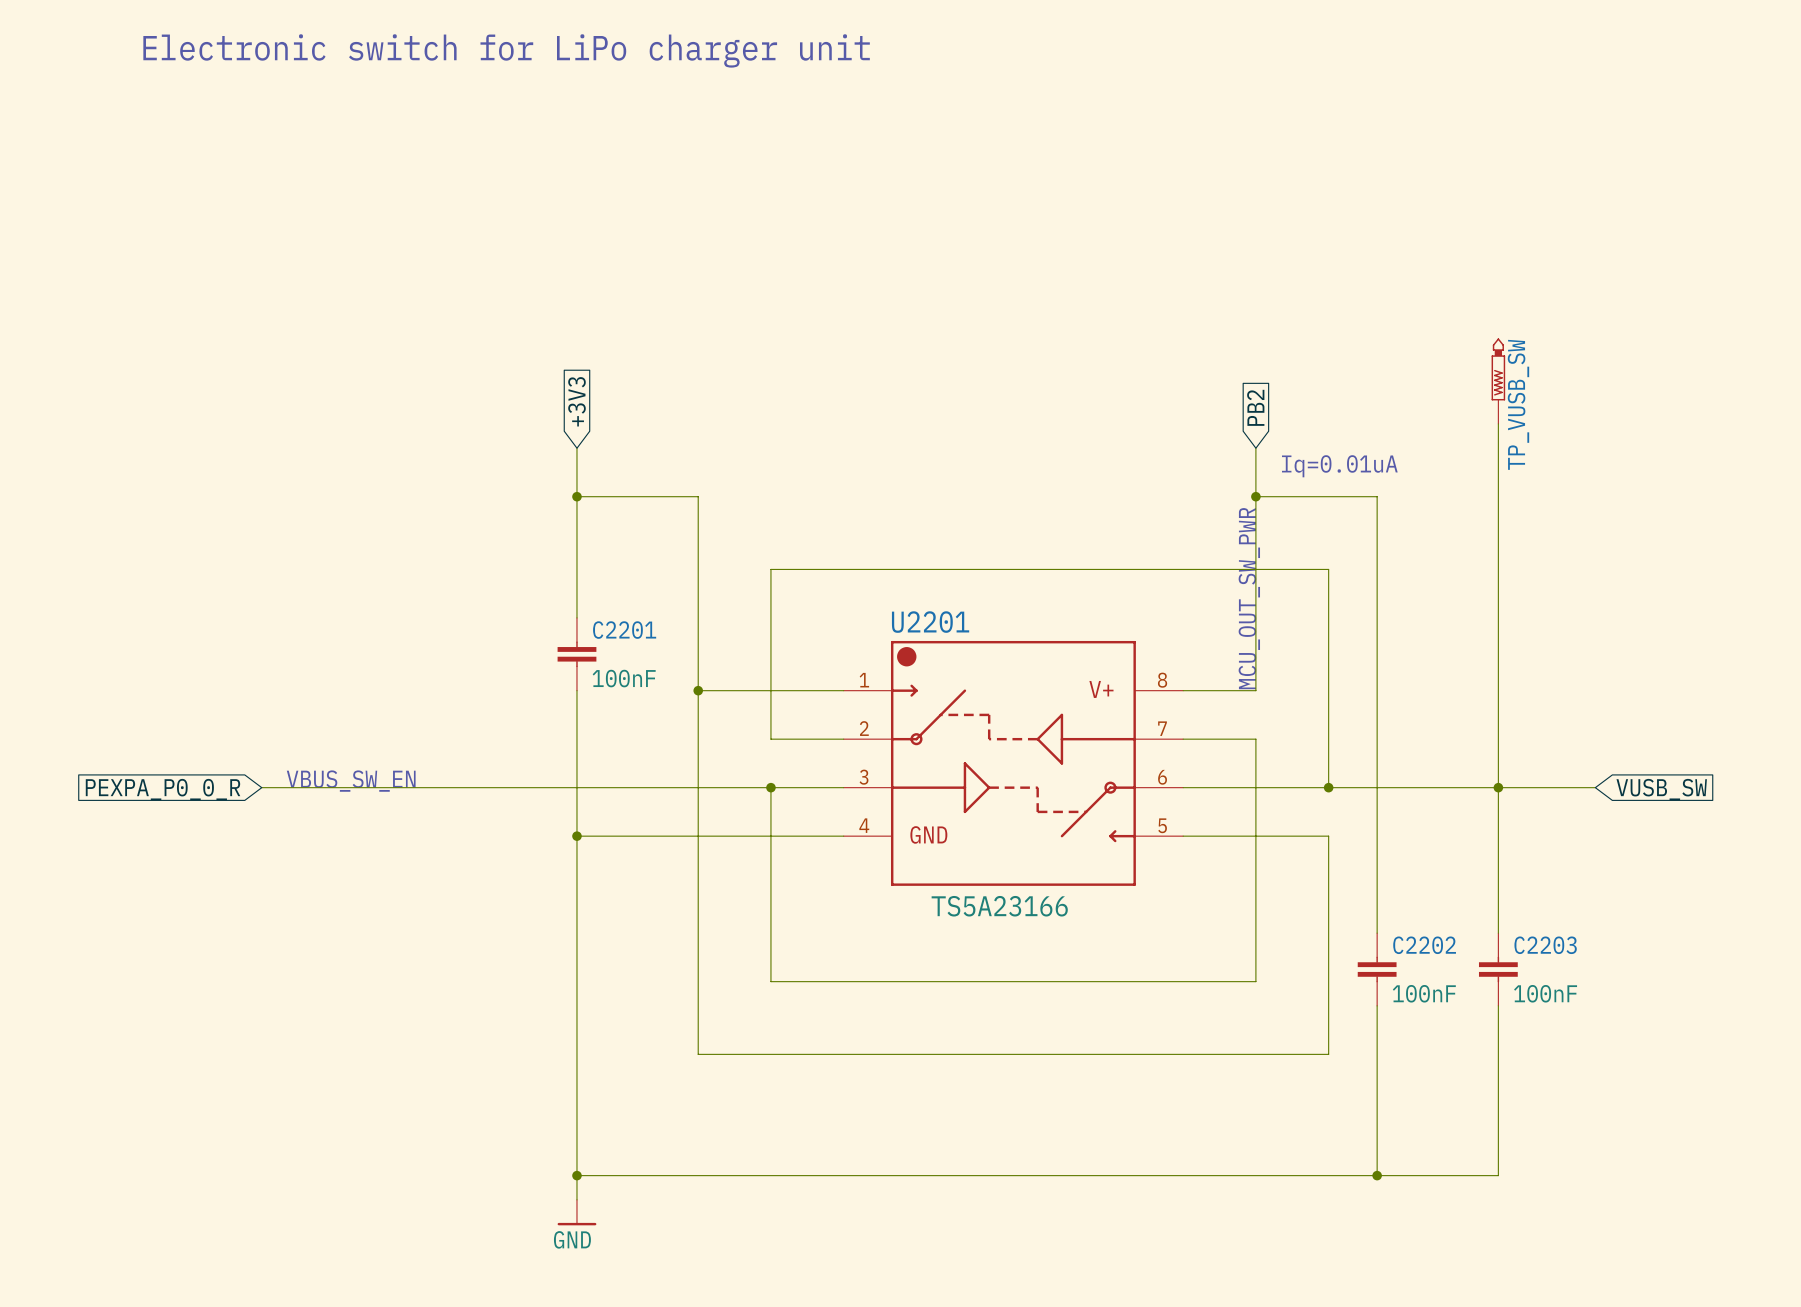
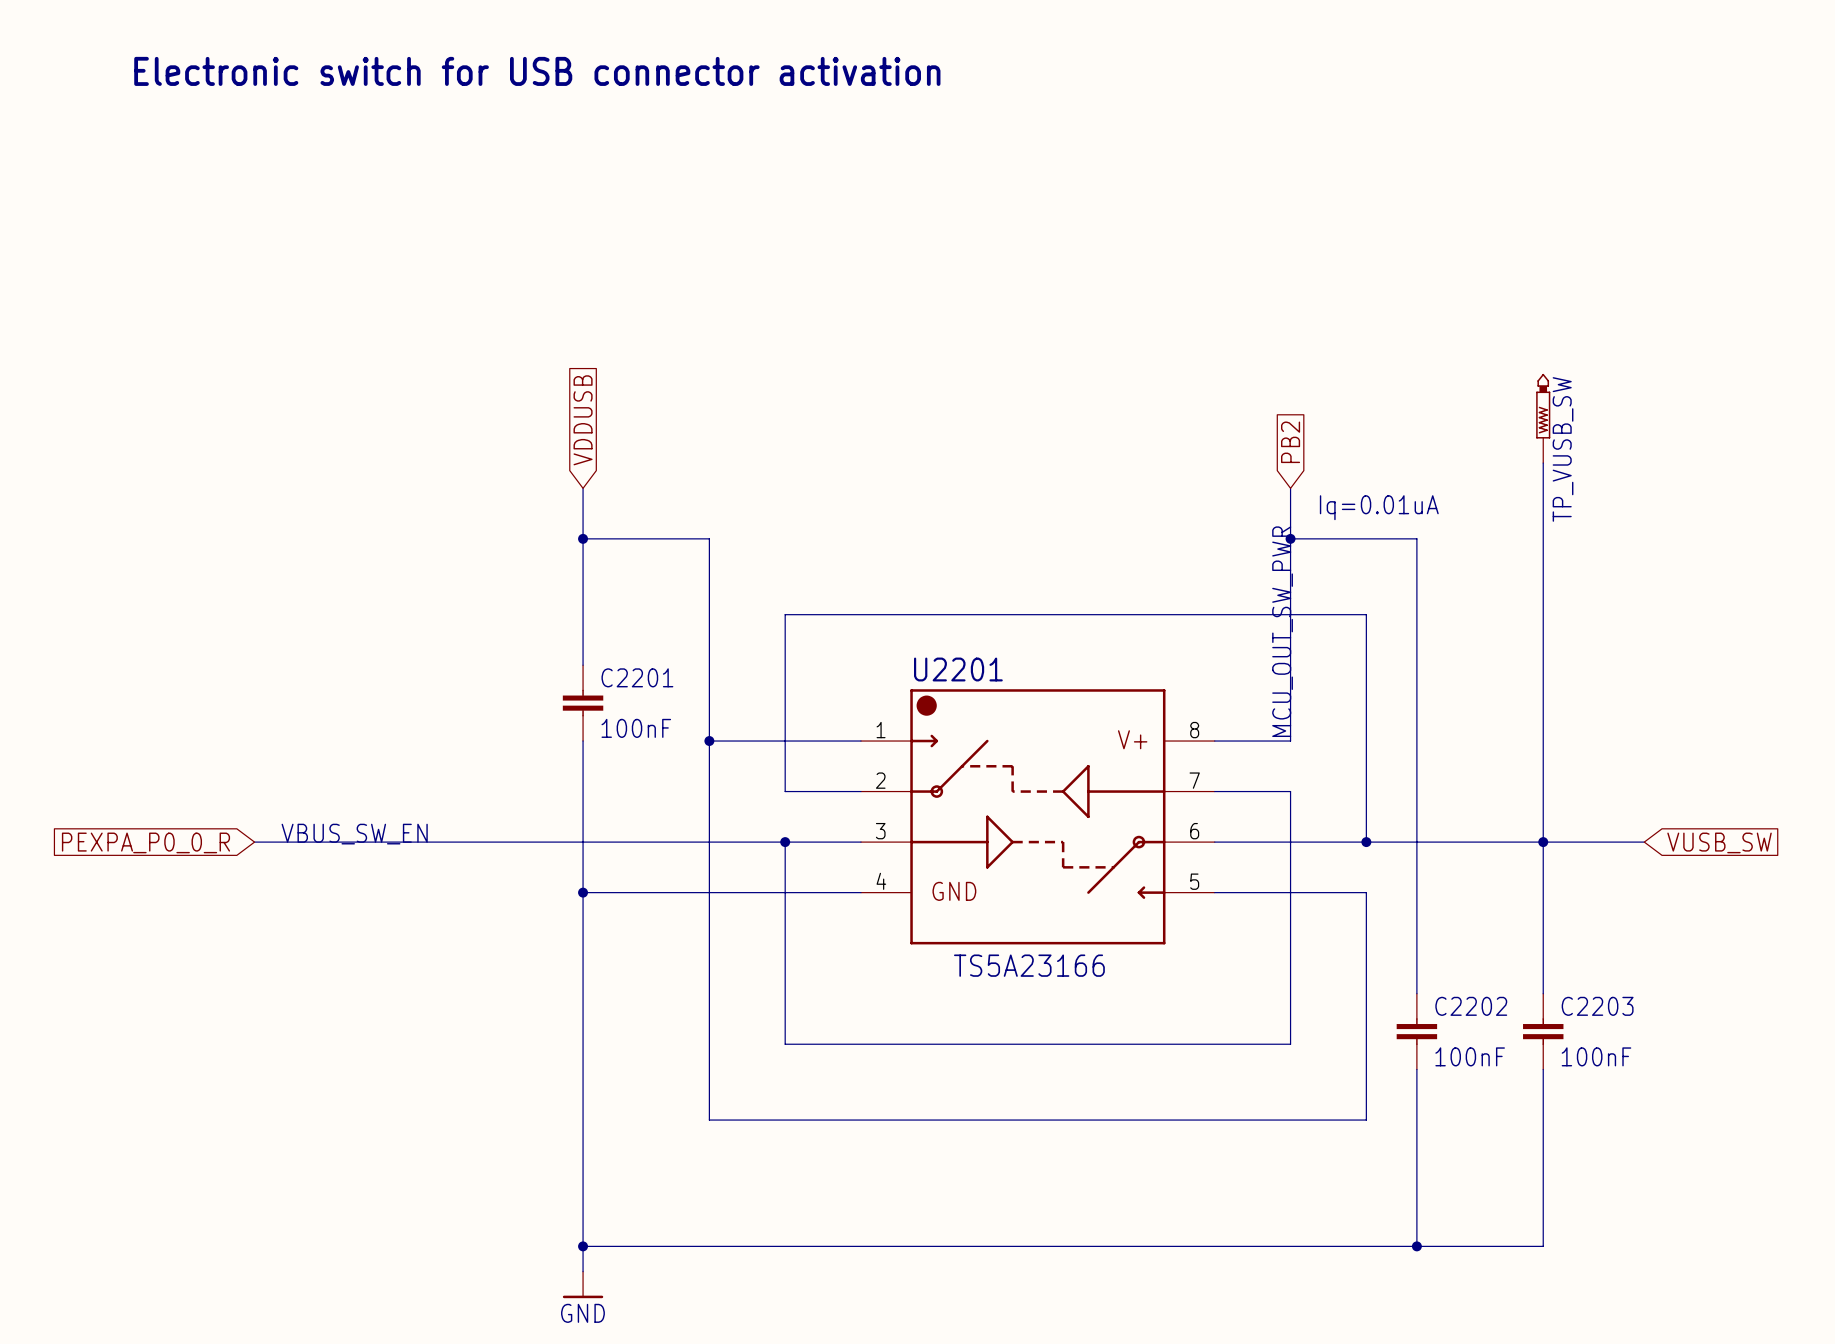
text: Electronic switch for LiPo charger unit (506, 50) -> Electronic switch for USB connector activation (537, 71)
global label: +3V3 (576, 401) -> VDDUSB (583, 420)

